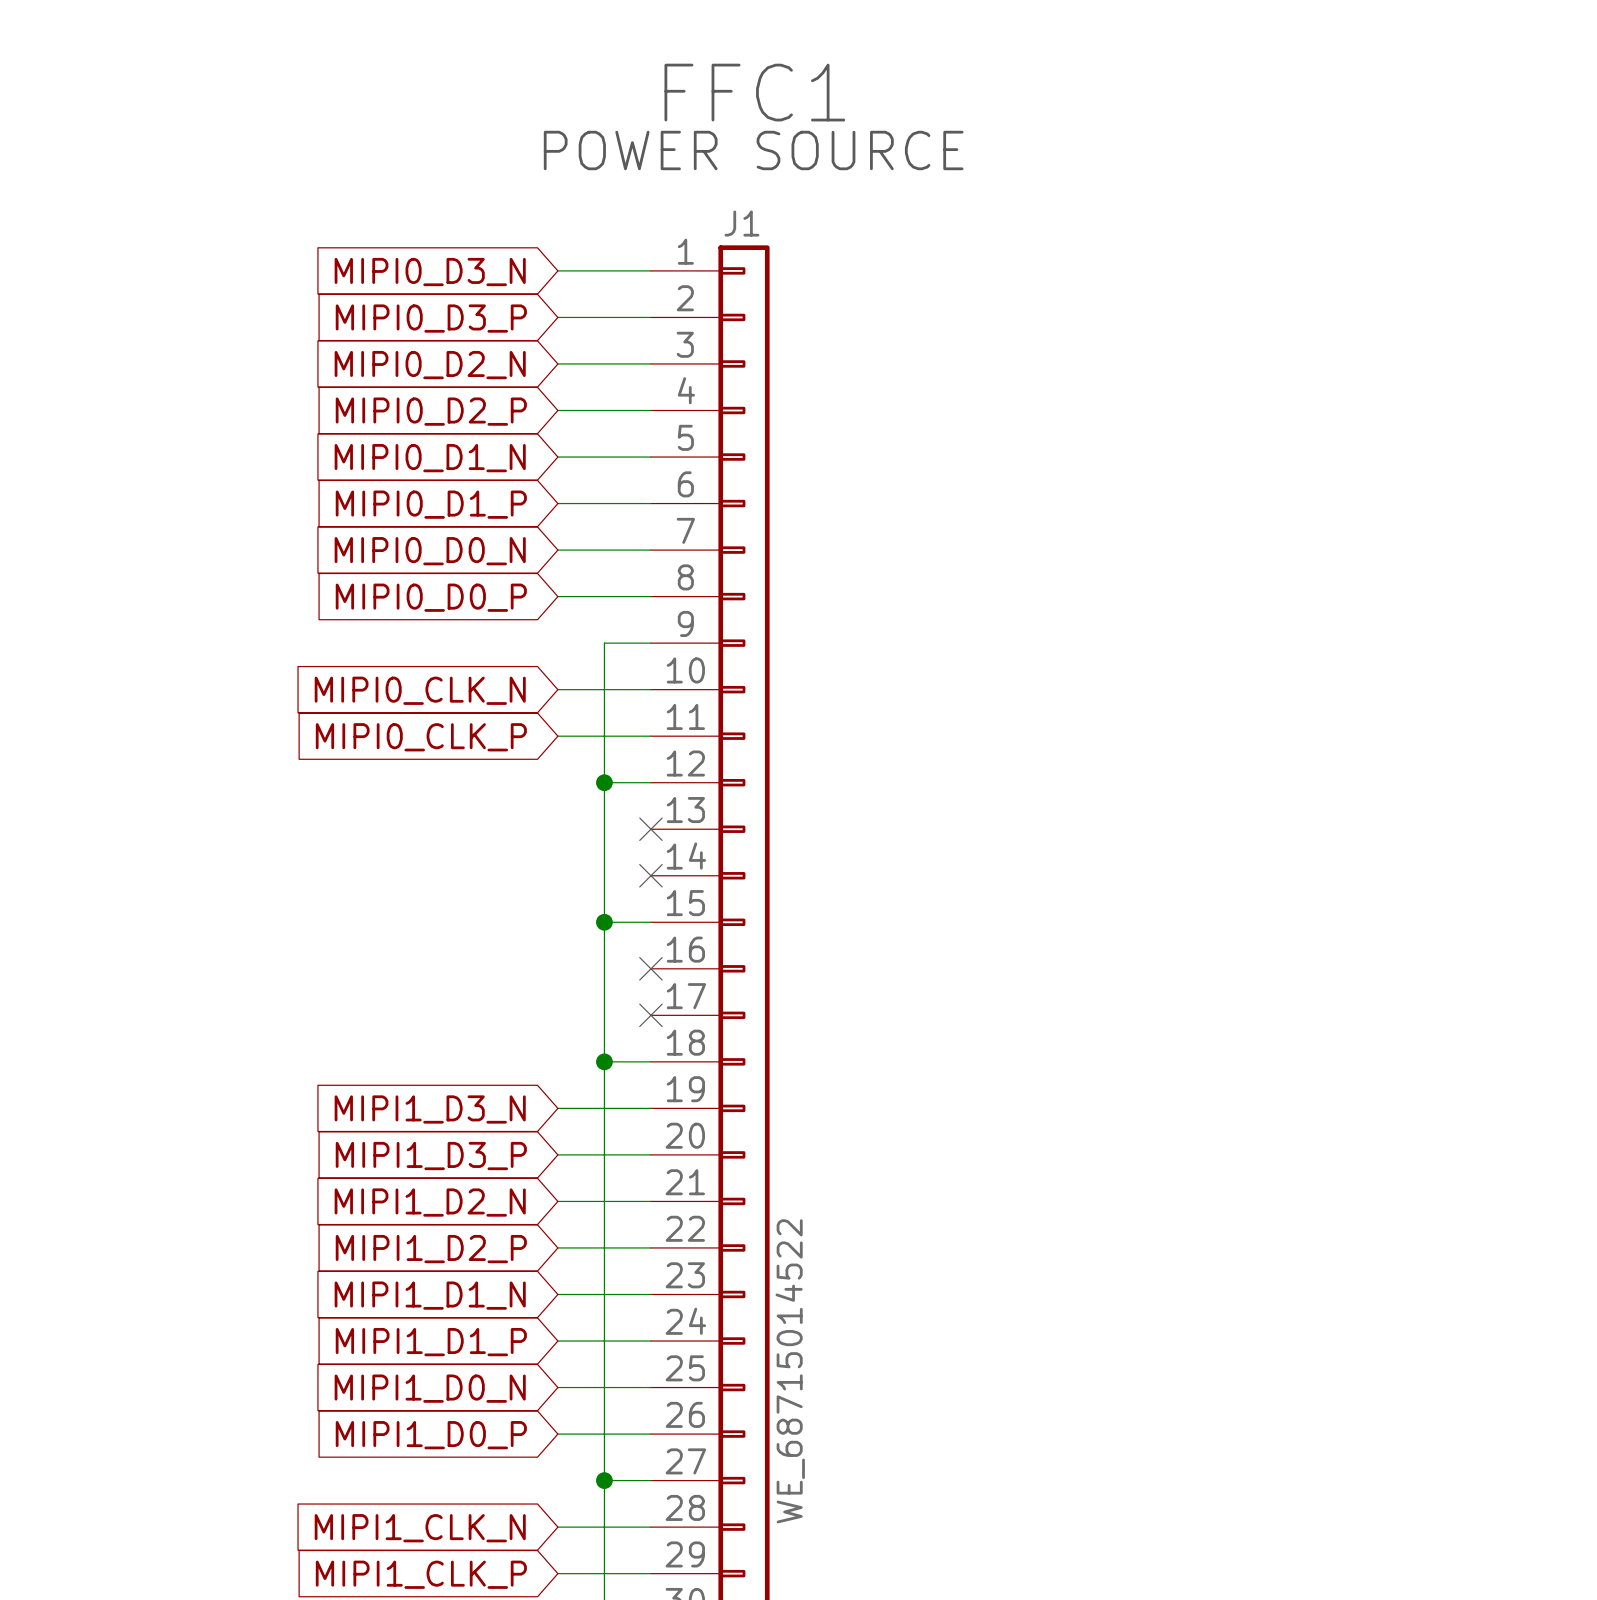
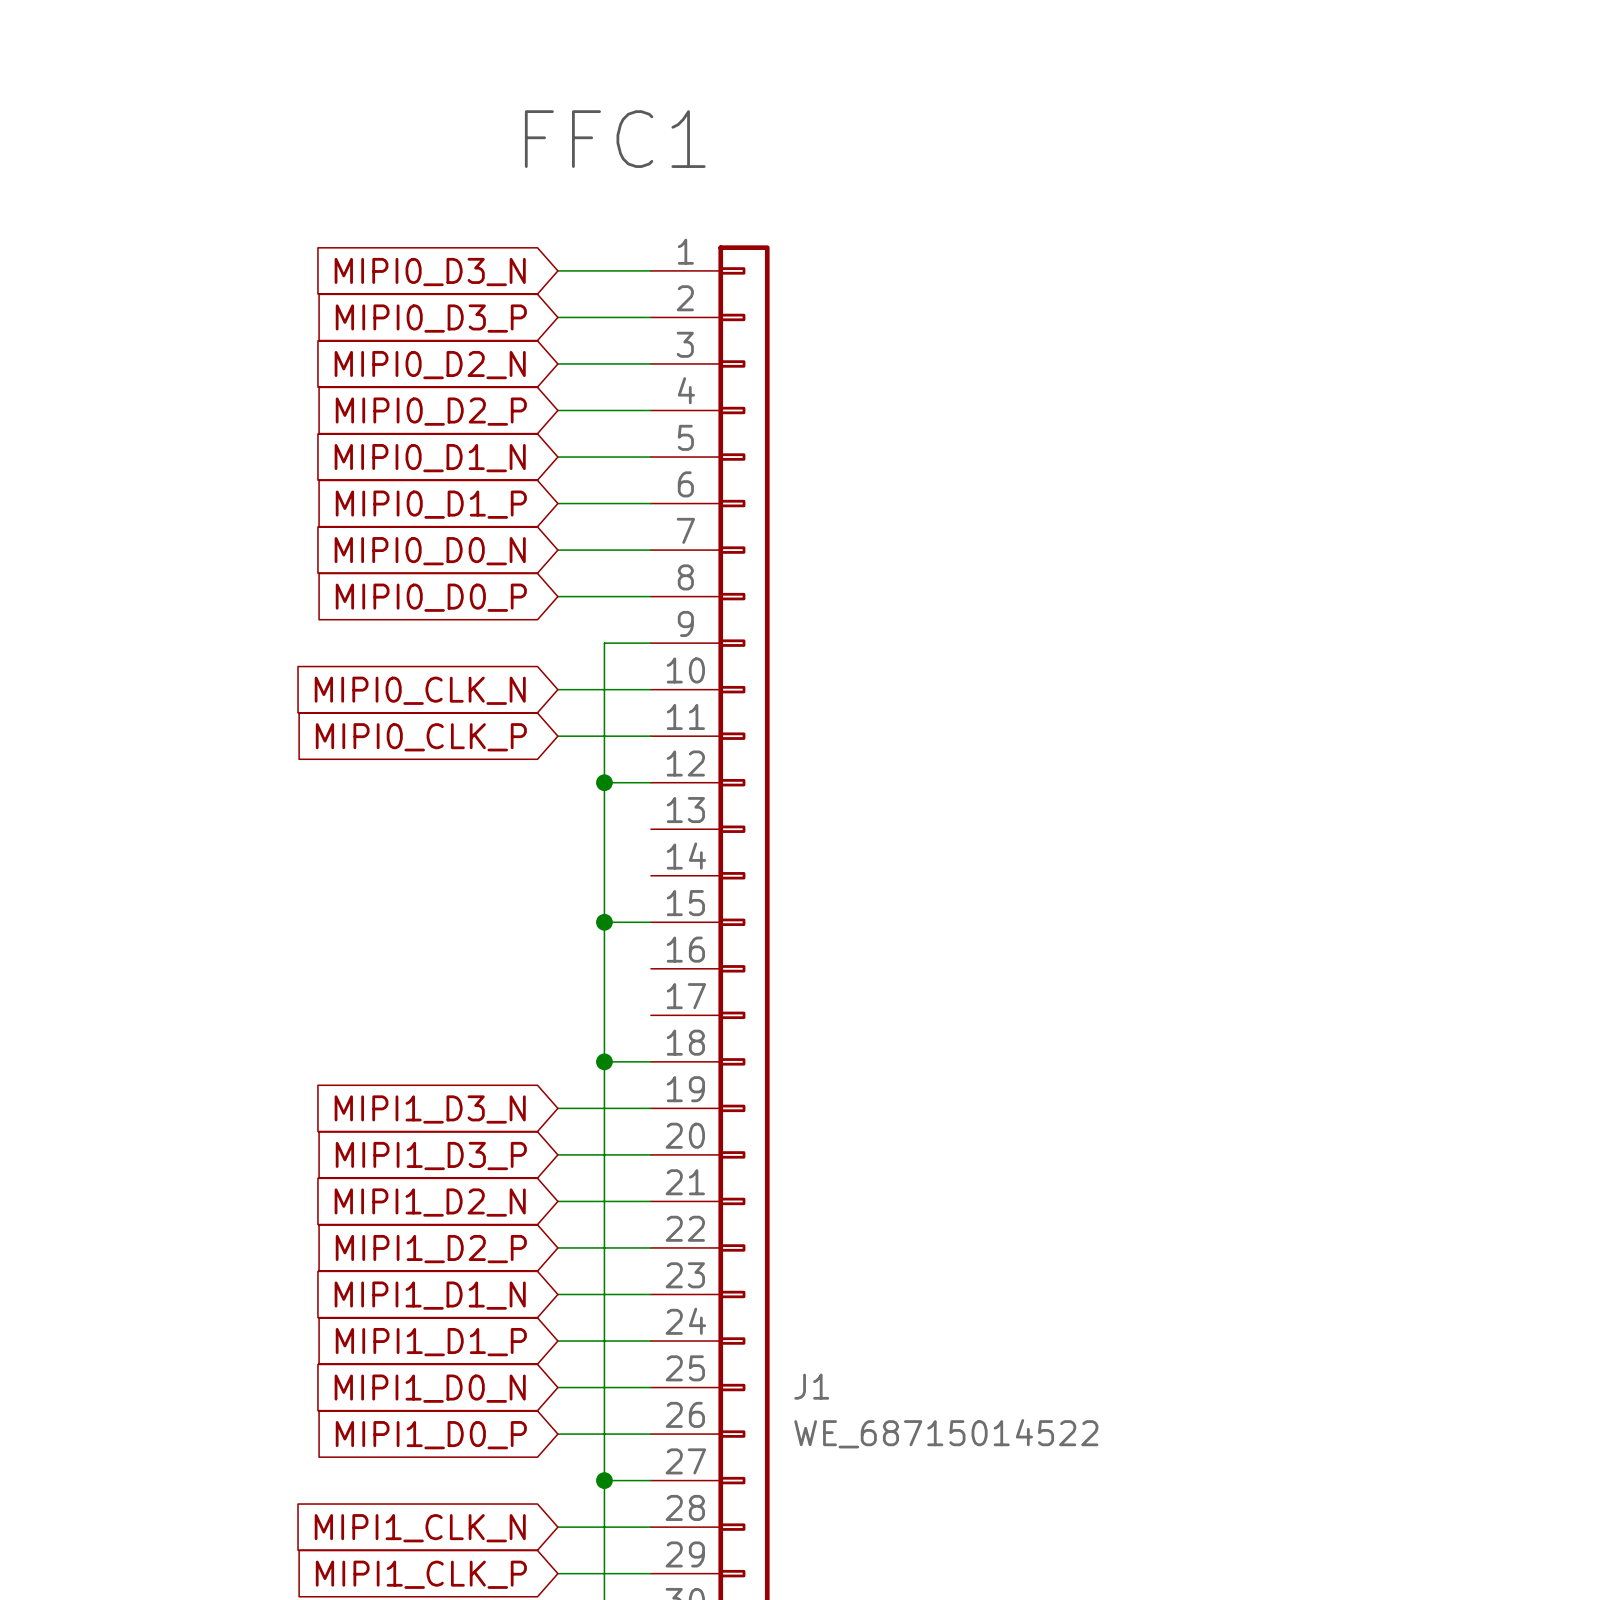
text position: FFC1 (754, 92) -> FFC1 (615, 139)
text: POWER SOURCE (753, 150) -> none
J1 name position: J1 (741, 223) -> J1 (811, 1386)
no-connect mark: (650, 829) -> none
no-connect mark: (650, 875) -> none
no-connect mark: (650, 968) -> none
no-connect mark: (650, 1015) -> none
J1 value rotation: 0° (790, 1371) -> 90° clockwise (946, 1433)

